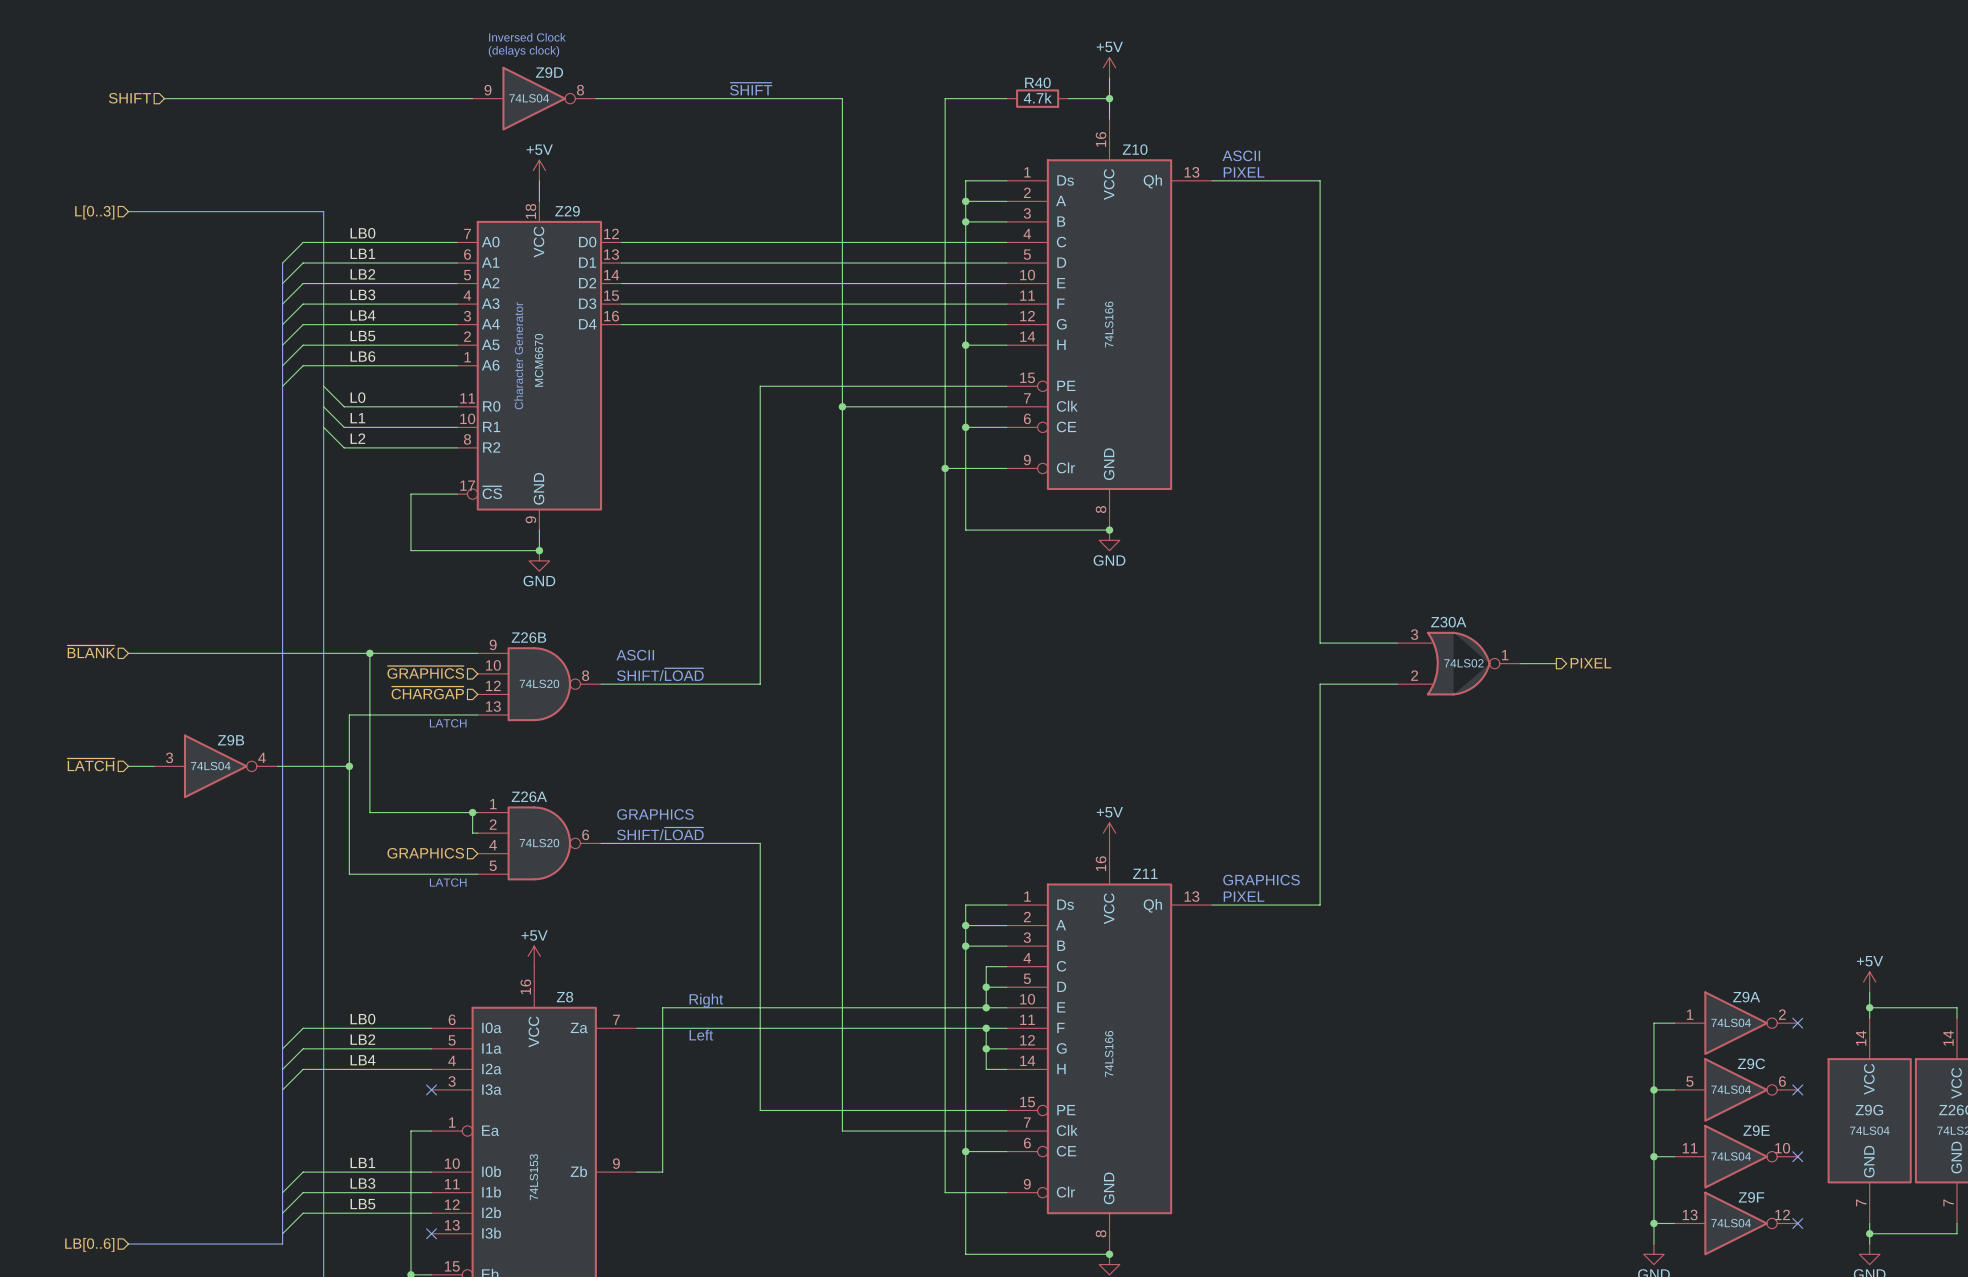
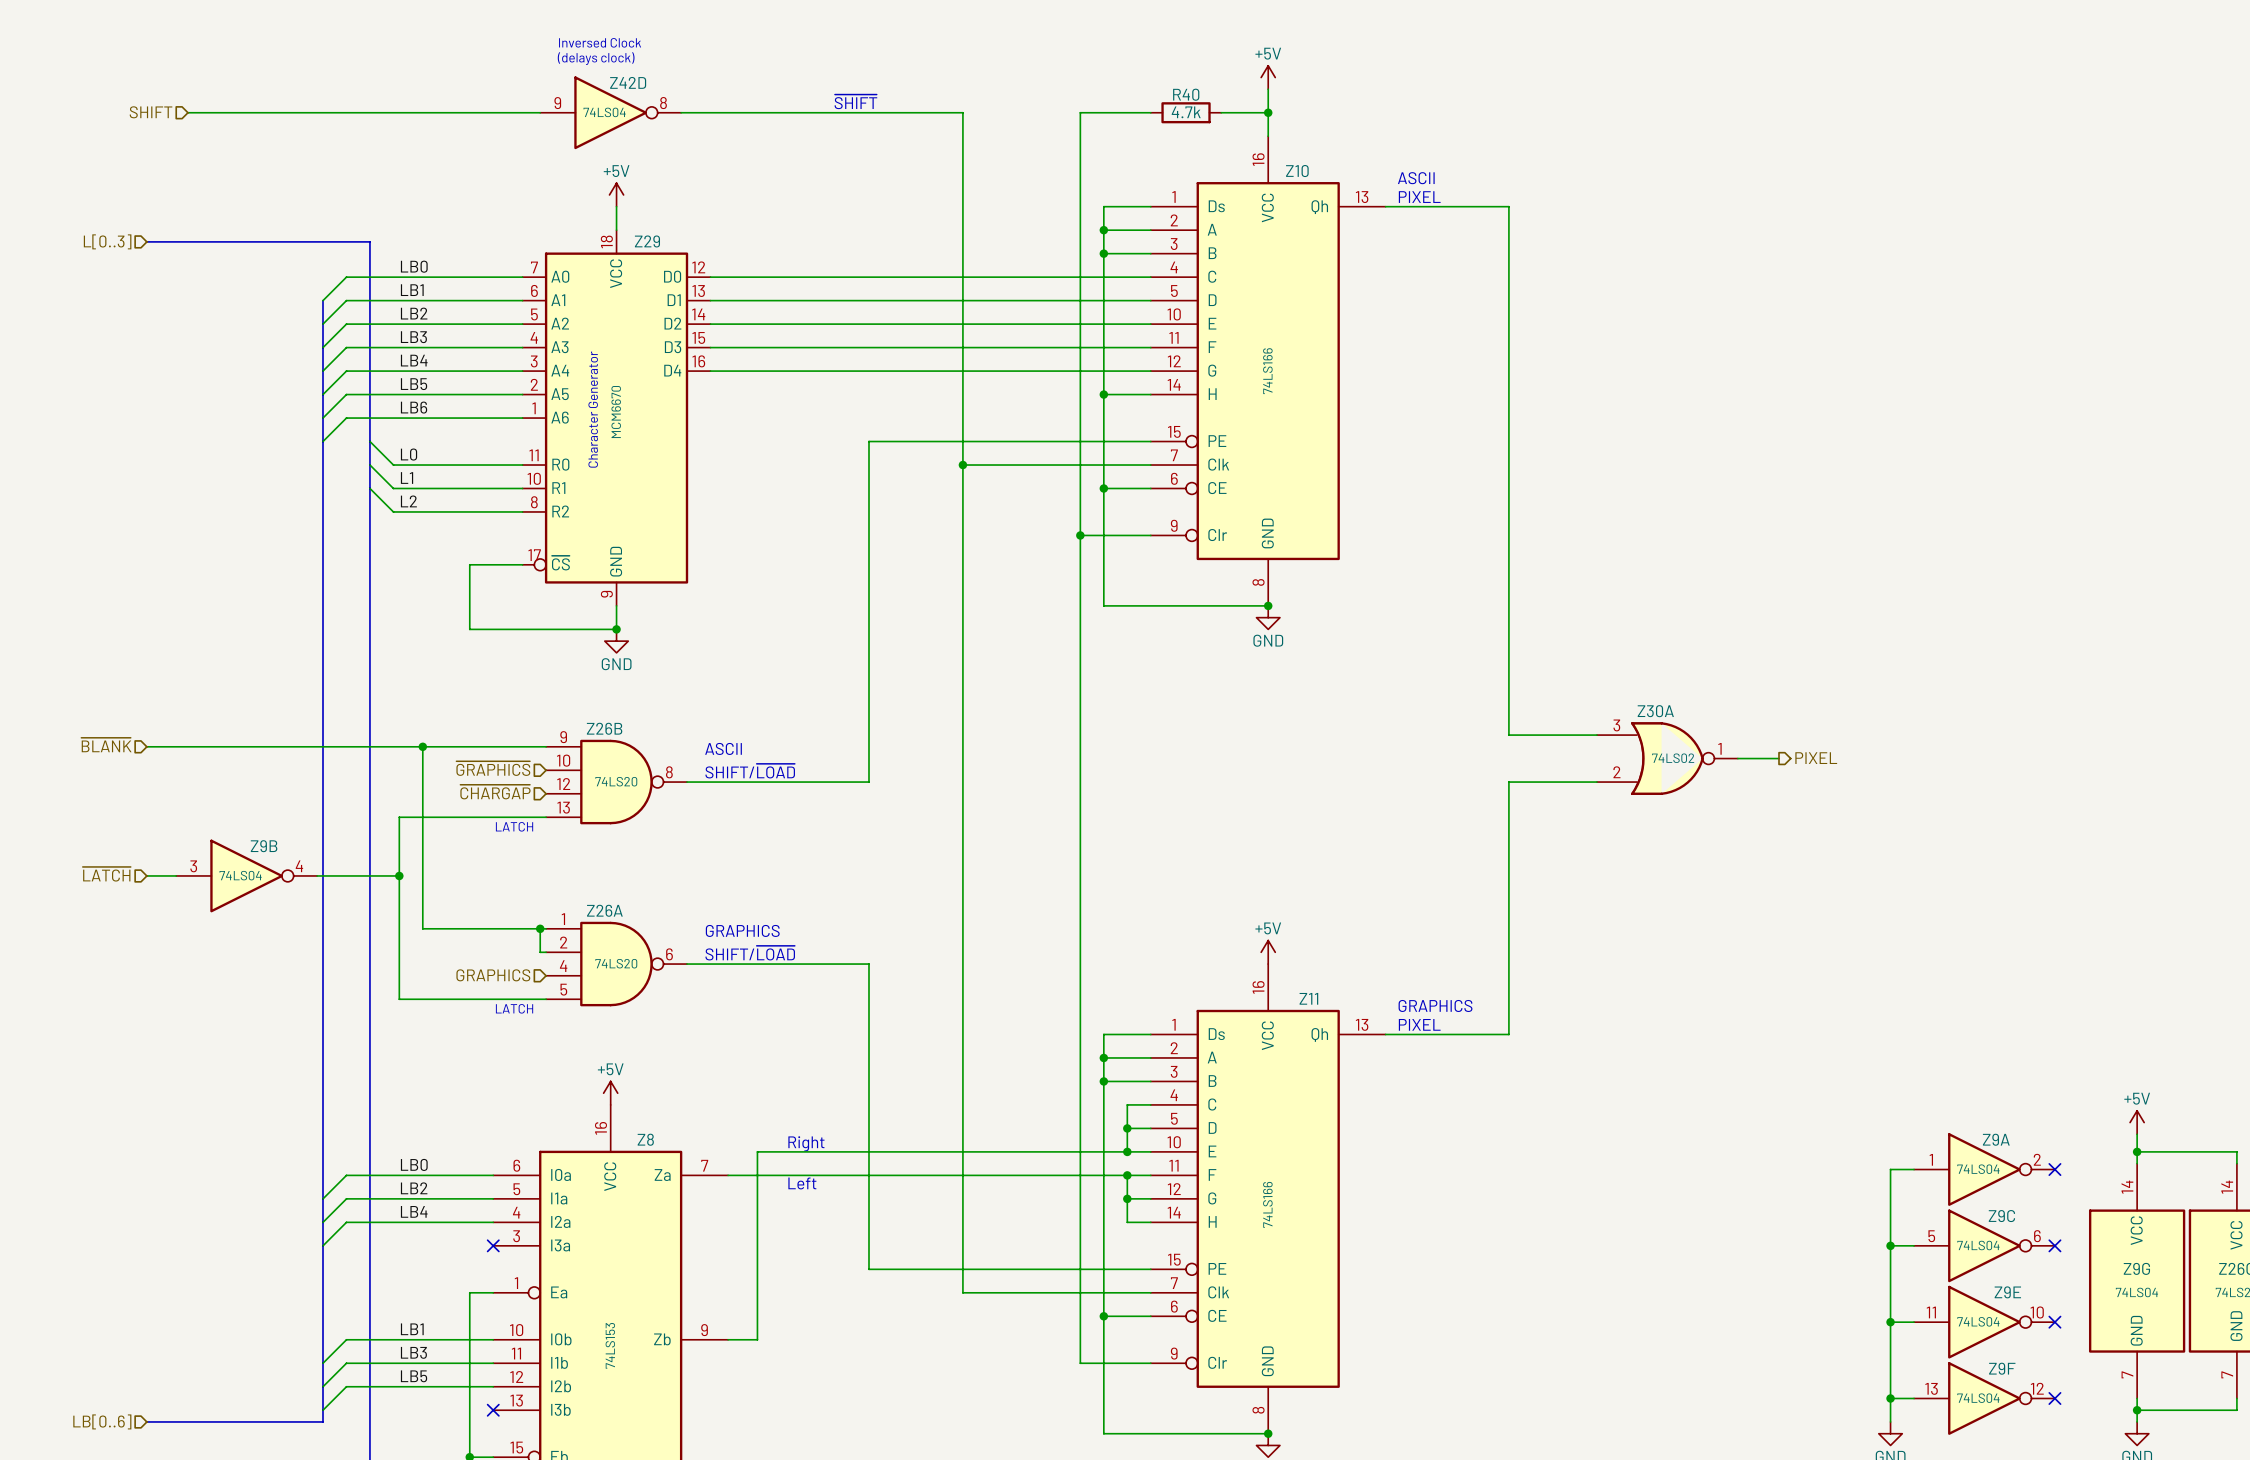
Z9D name: Z9D (549, 72) -> Z42D (628, 82)

